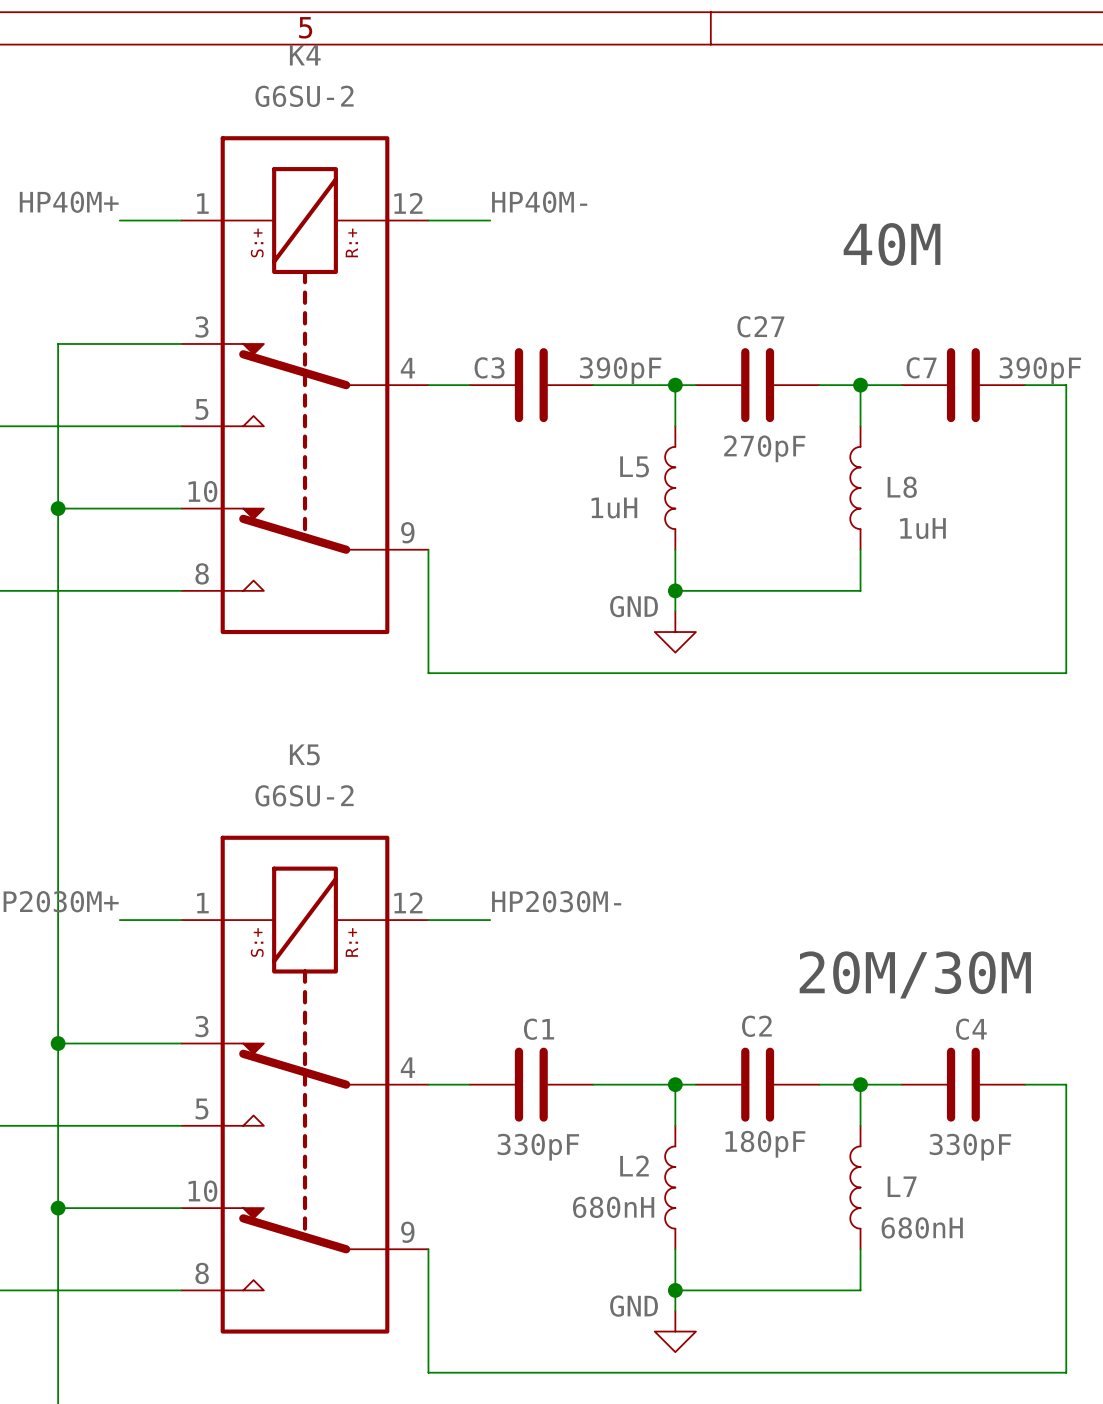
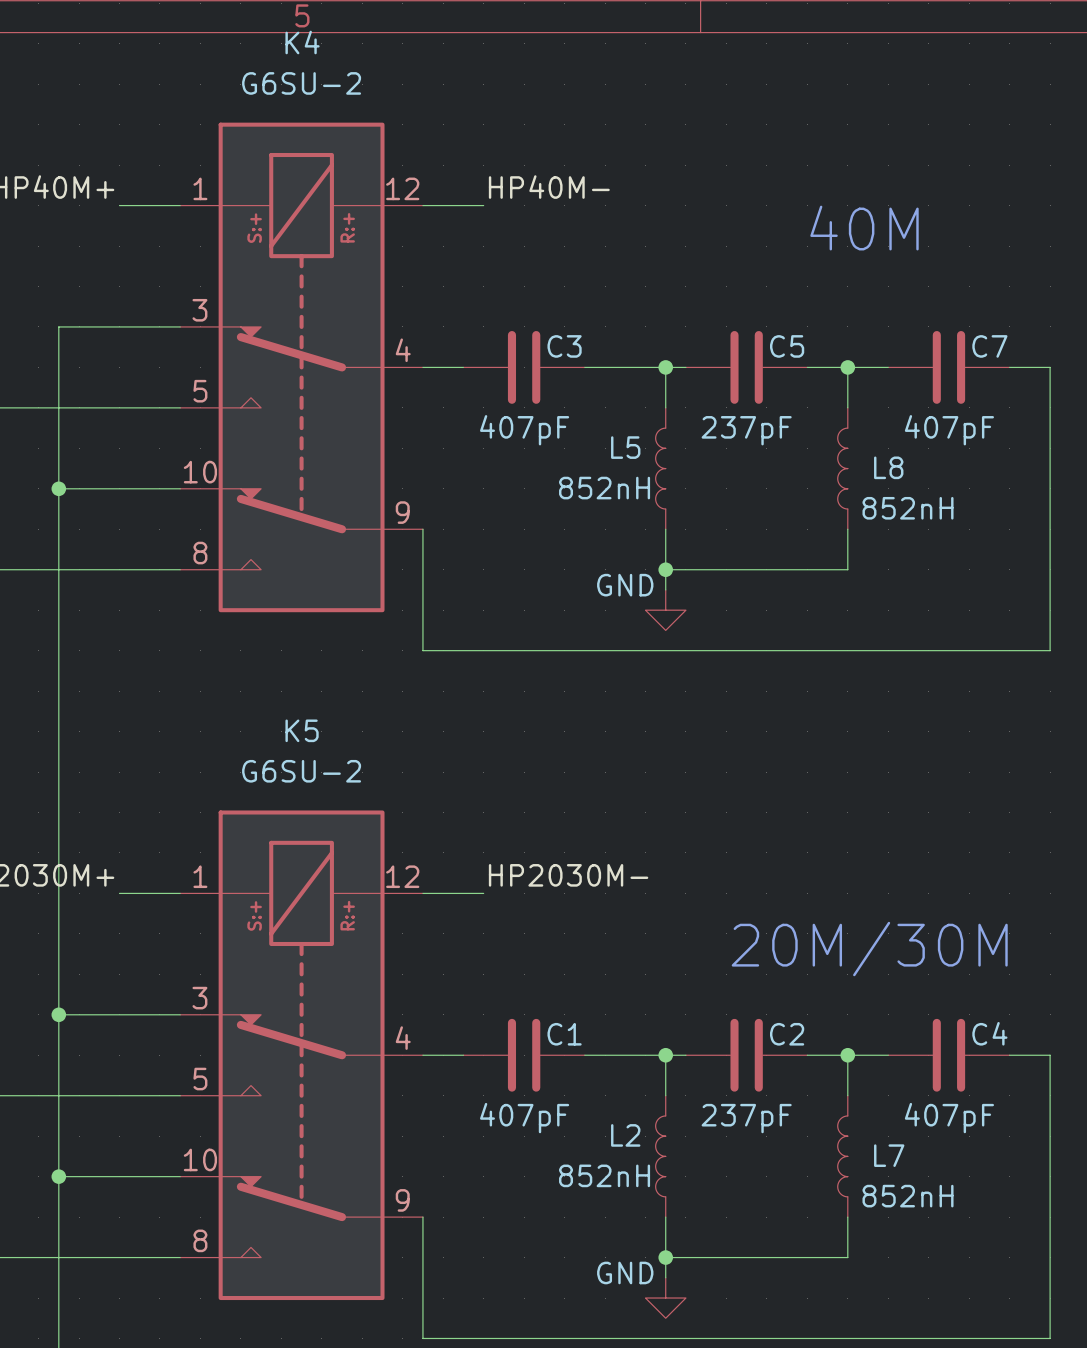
C27 name: C27 (760, 326) -> C5 (787, 346)
C3 name position: C3 (489, 367) -> C3 (564, 346)
C7 name position: C7 (921, 367) -> C7 (989, 346)
C3 value: 390pF (620, 370) -> 407pF (524, 430)
C7 value: 390pF (1040, 370) -> 407pF (949, 430)
C27 value: 270pF (764, 448) -> 237pF (746, 430)
L5 value: 1uH (614, 508) -> 852nH (604, 488)
L8 value: 1uH (923, 528) -> 852nH (908, 508)
C2 name position: C2 (756, 1026) -> C2 (787, 1034)
C1 name position: C1 (539, 1029) -> C1 (564, 1034)
C4 name position: C4 (971, 1029) -> C4 (989, 1033)
C2 value: 180pF (765, 1144) -> 237pF (746, 1118)
C1 value: 330pF (538, 1147) -> 407pF (524, 1118)
C4 value: 330pF (970, 1147) -> 407pF (949, 1118)
L2 value: 680nH (613, 1207) -> 852nH (604, 1175)
L7 value: 680nH (922, 1227) -> 852nH (908, 1196)

